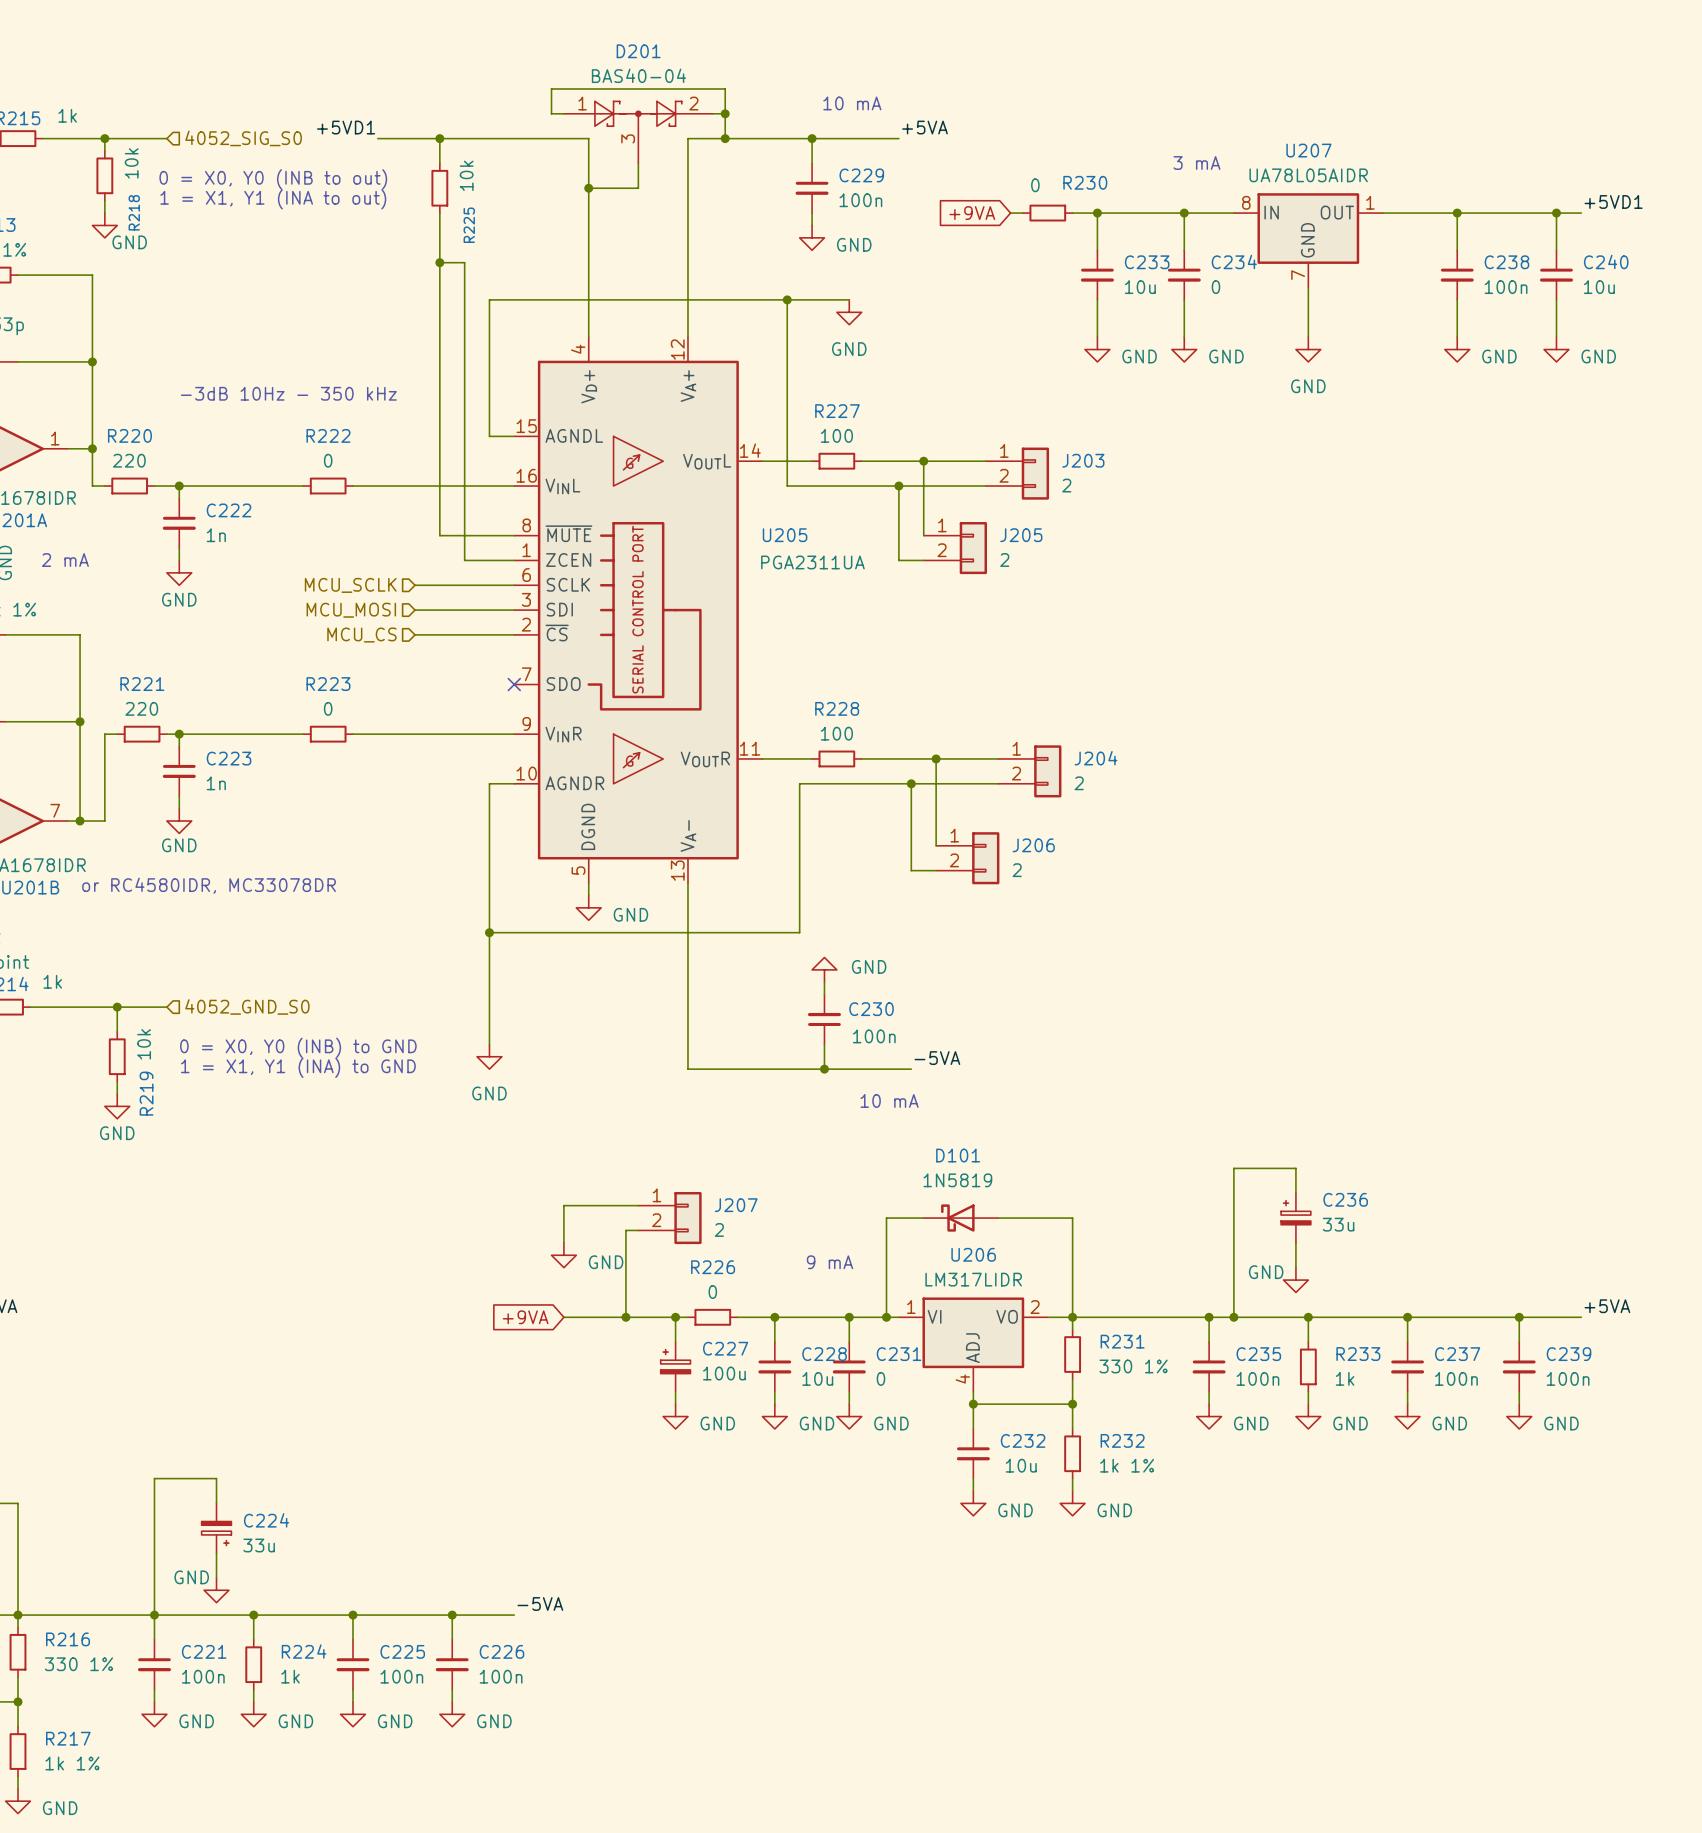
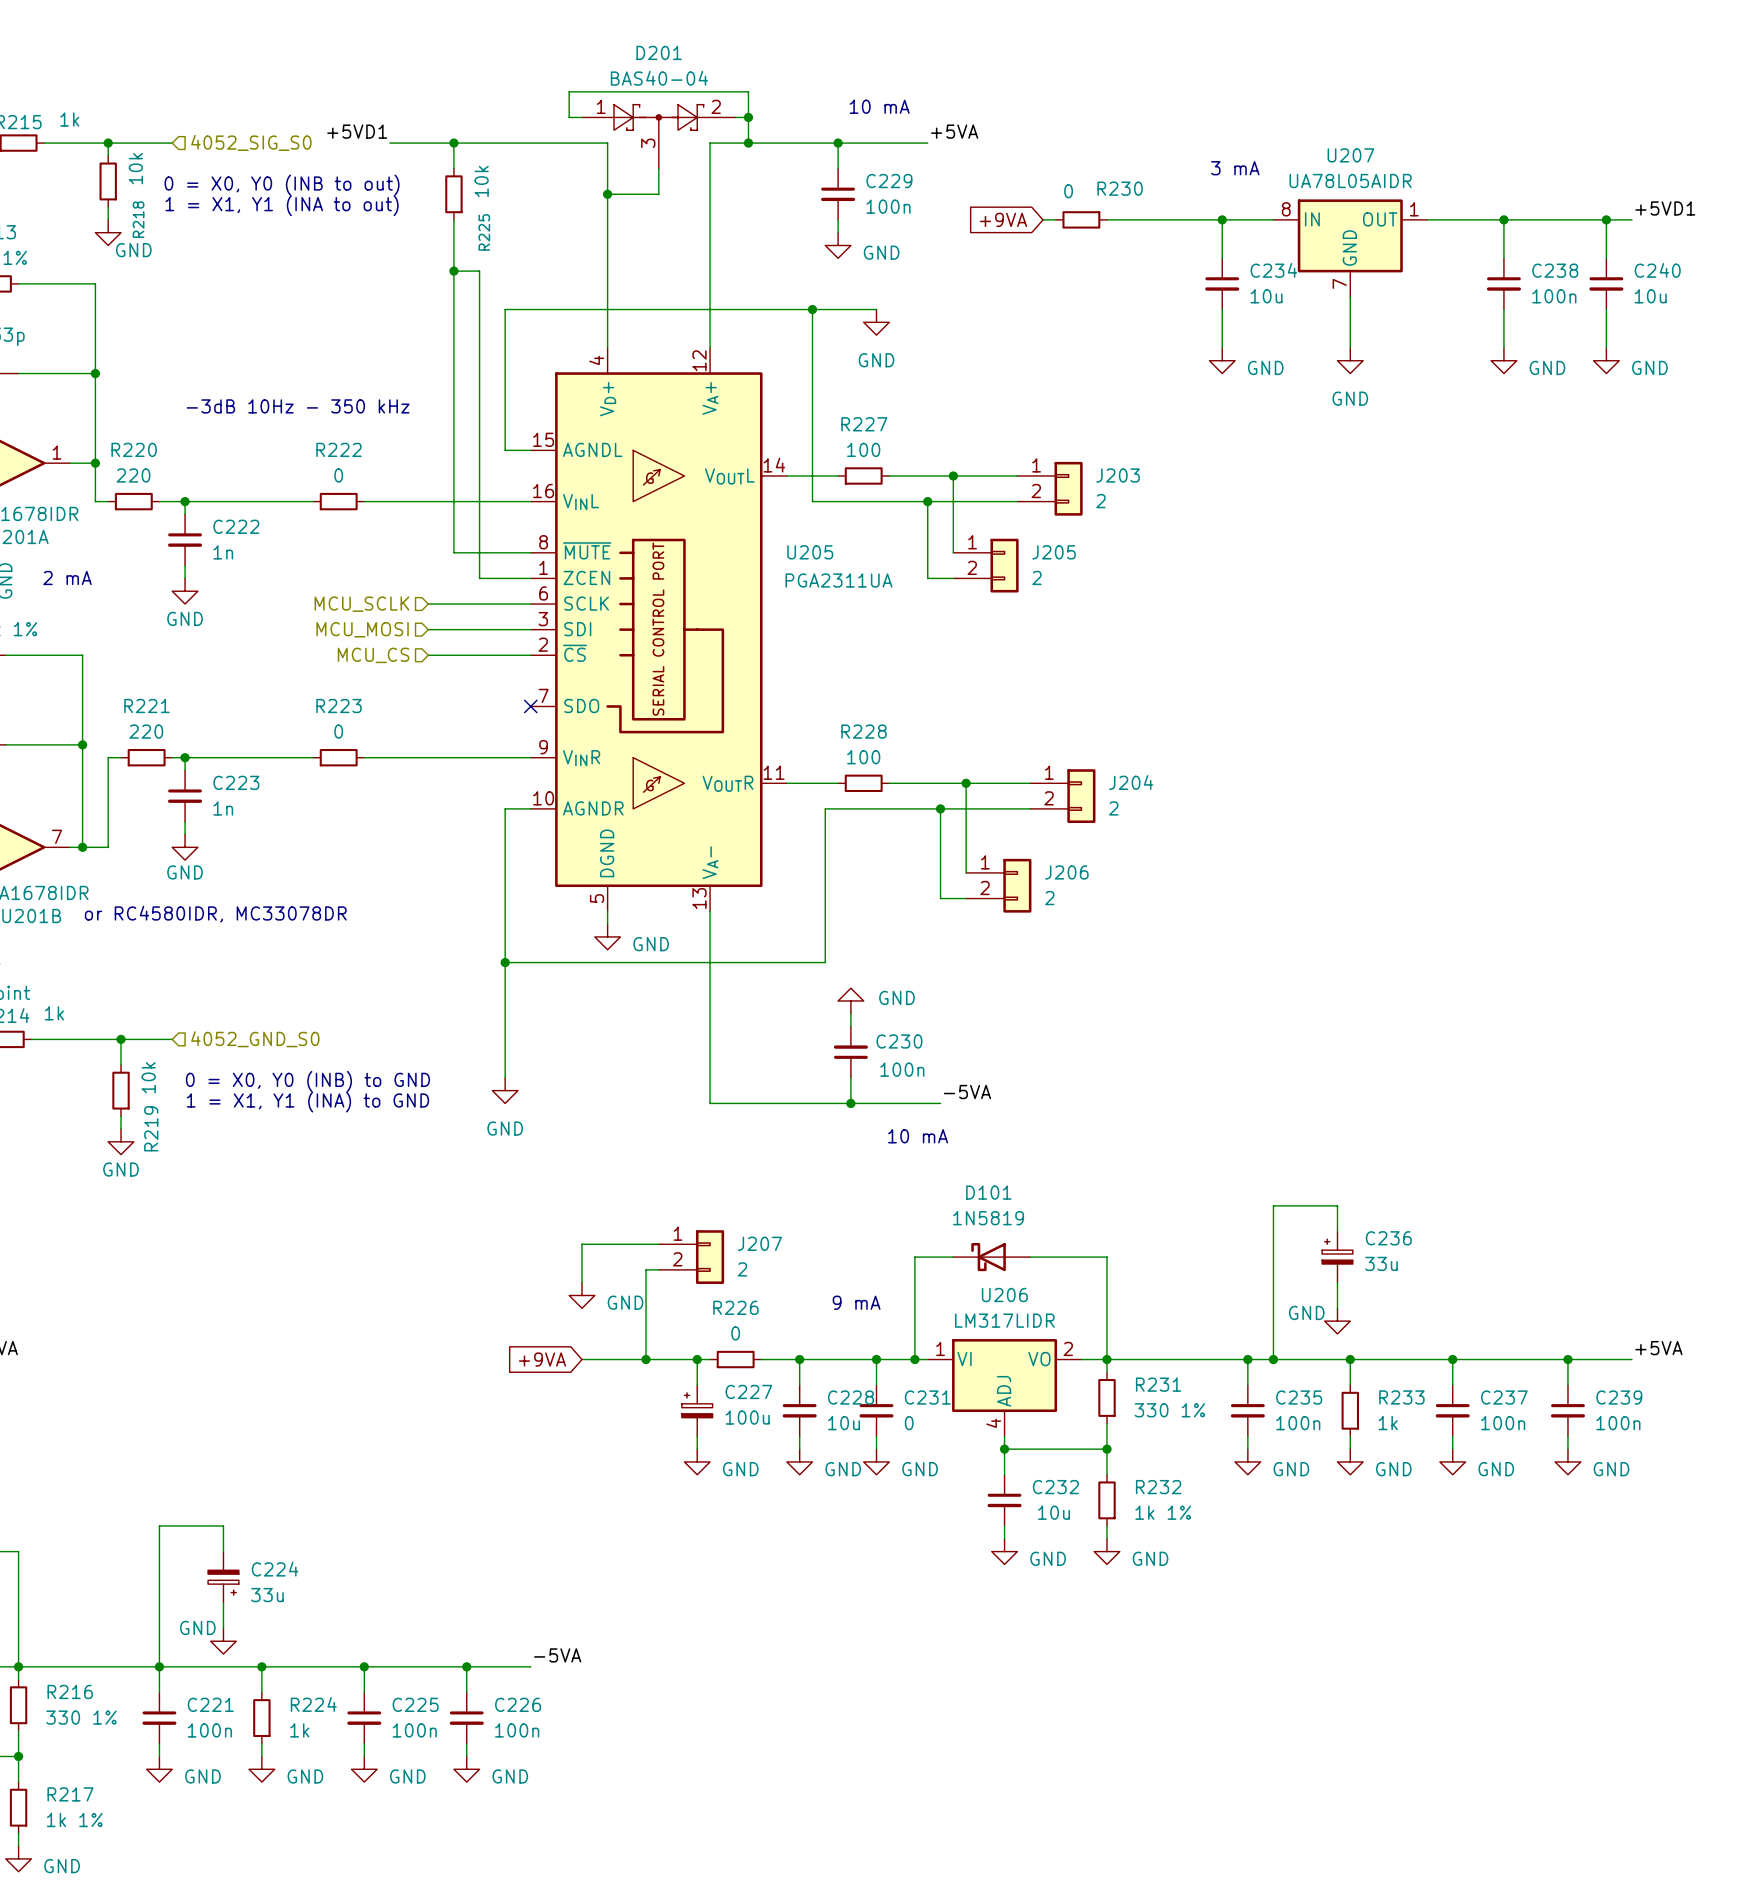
wire: (1097, 213) (1097, 250) -> none
junction: (1097, 213) -> none
C233: 10u (1097, 275) -> none
C234 value: 0 (1215, 287) -> 10u (1266, 296)
wire: (1097, 299) (1097, 337) -> none
power symbol: GND (1097, 349) -> none

